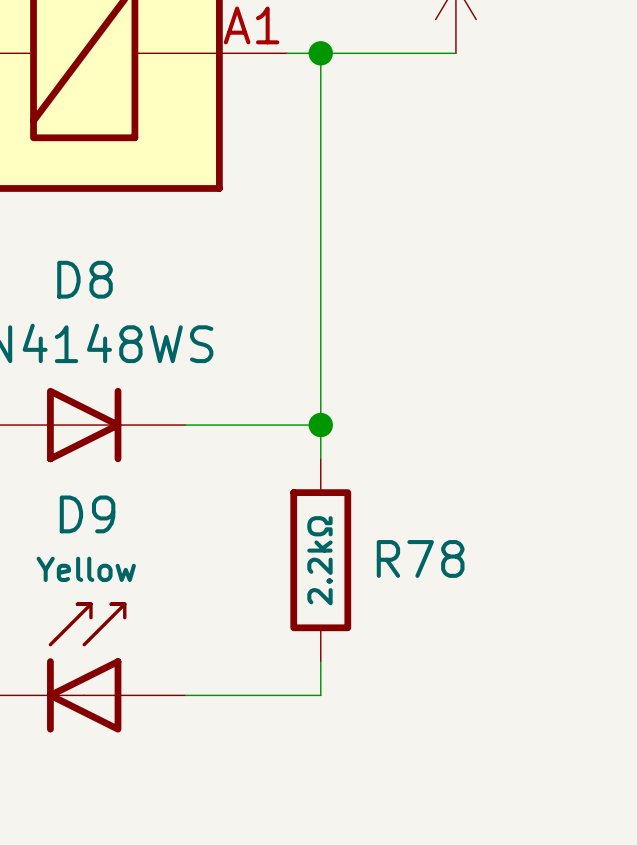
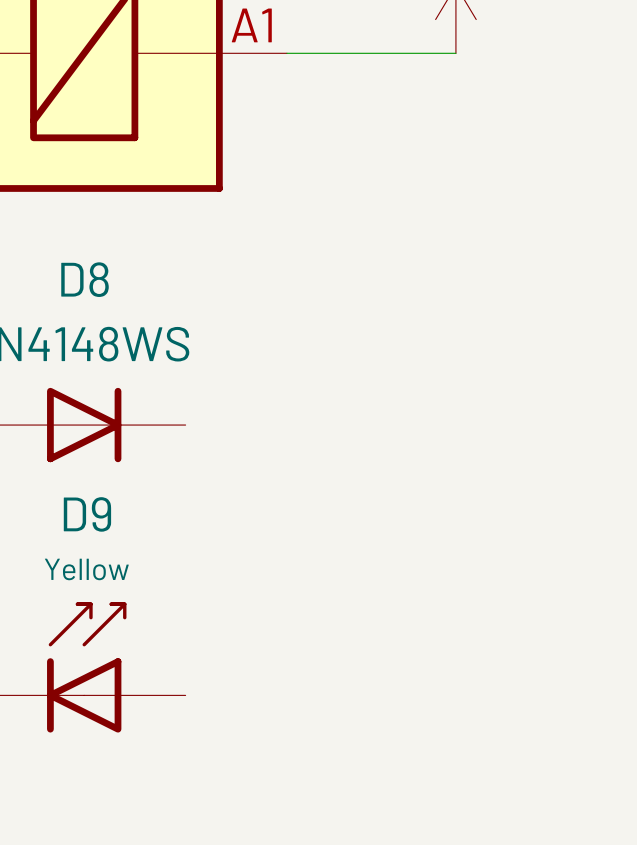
wire: (320, 53) (320, 458) -> none
junction: (320, 53) -> none
wire: (185, 425) (320, 425) -> none
junction: (320, 425) -> none
R78: 2.2kΩ (320, 560) -> none
wire: (320, 661) (320, 695) (185, 695) -> none

